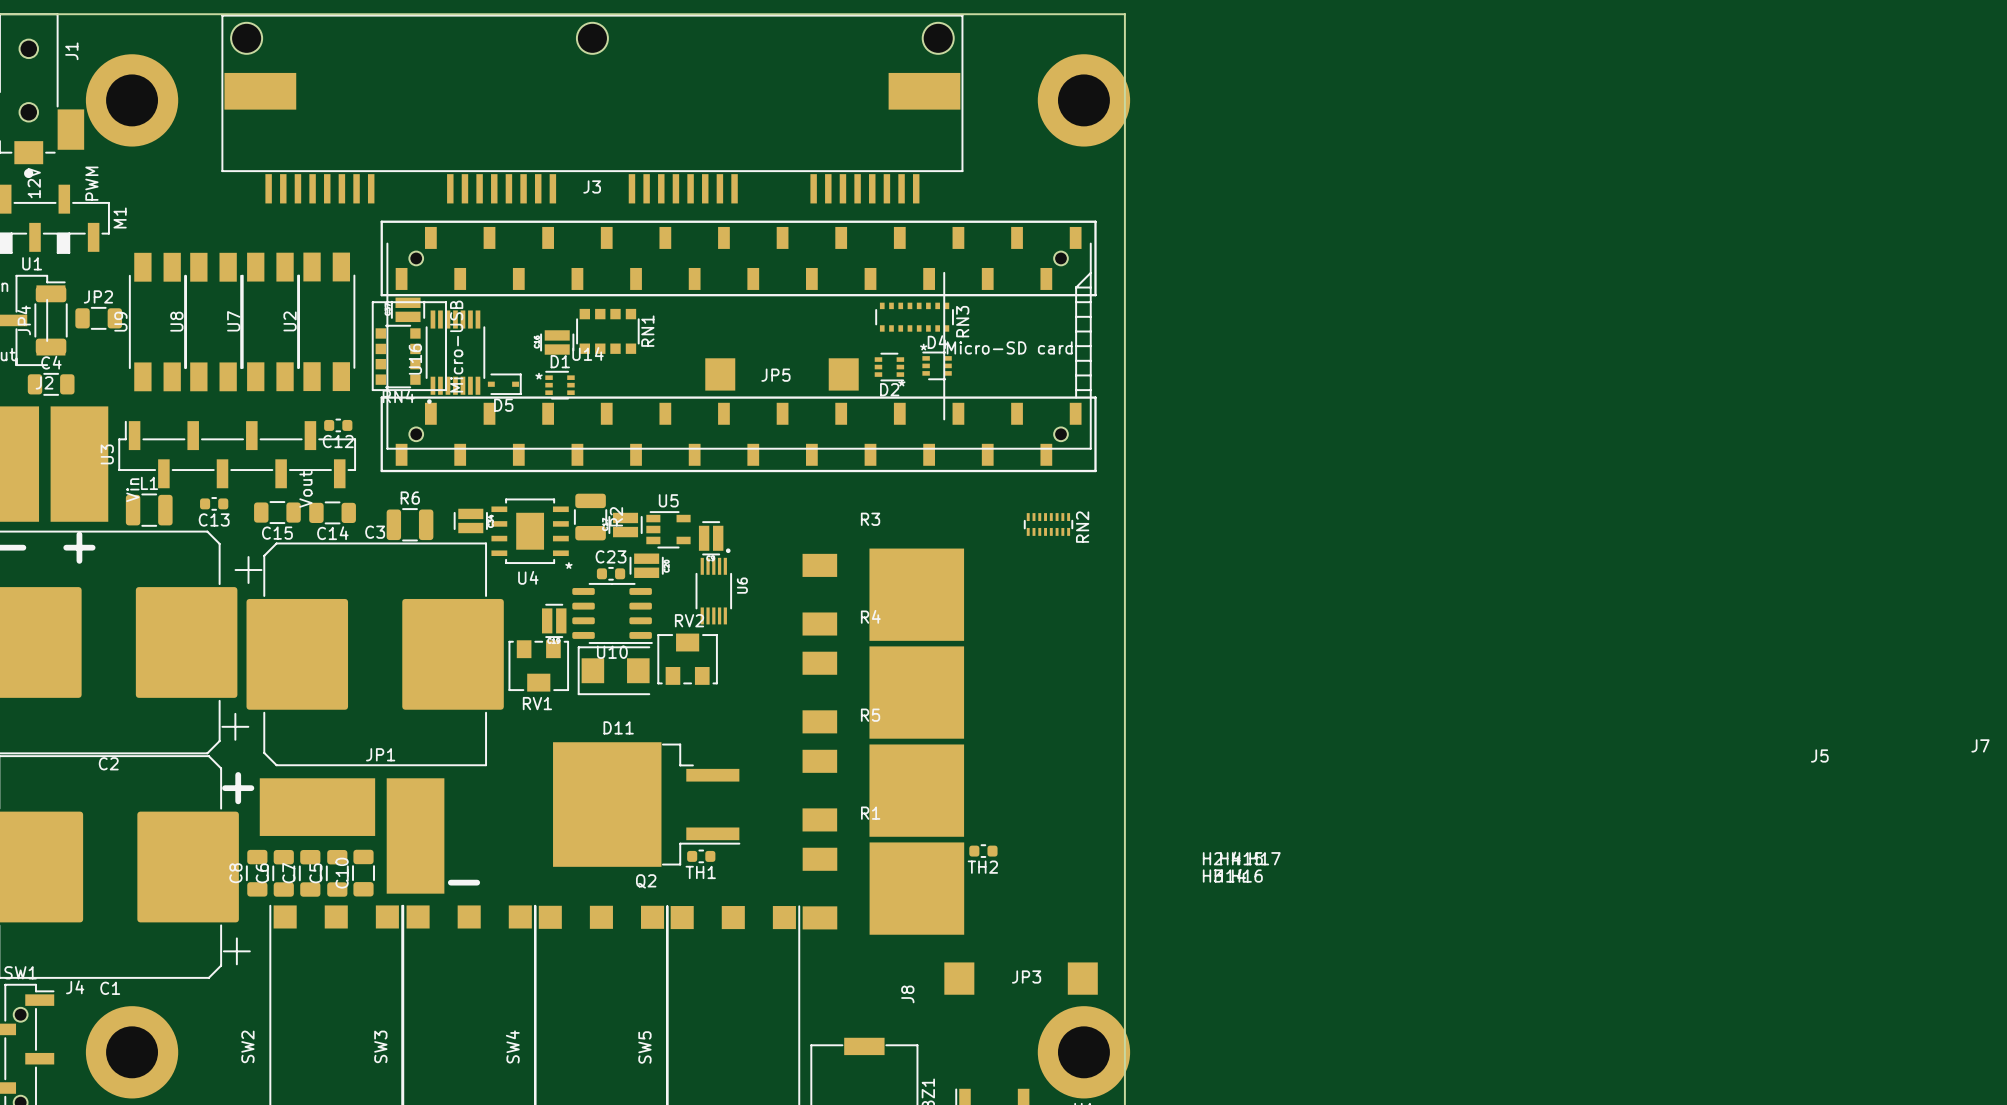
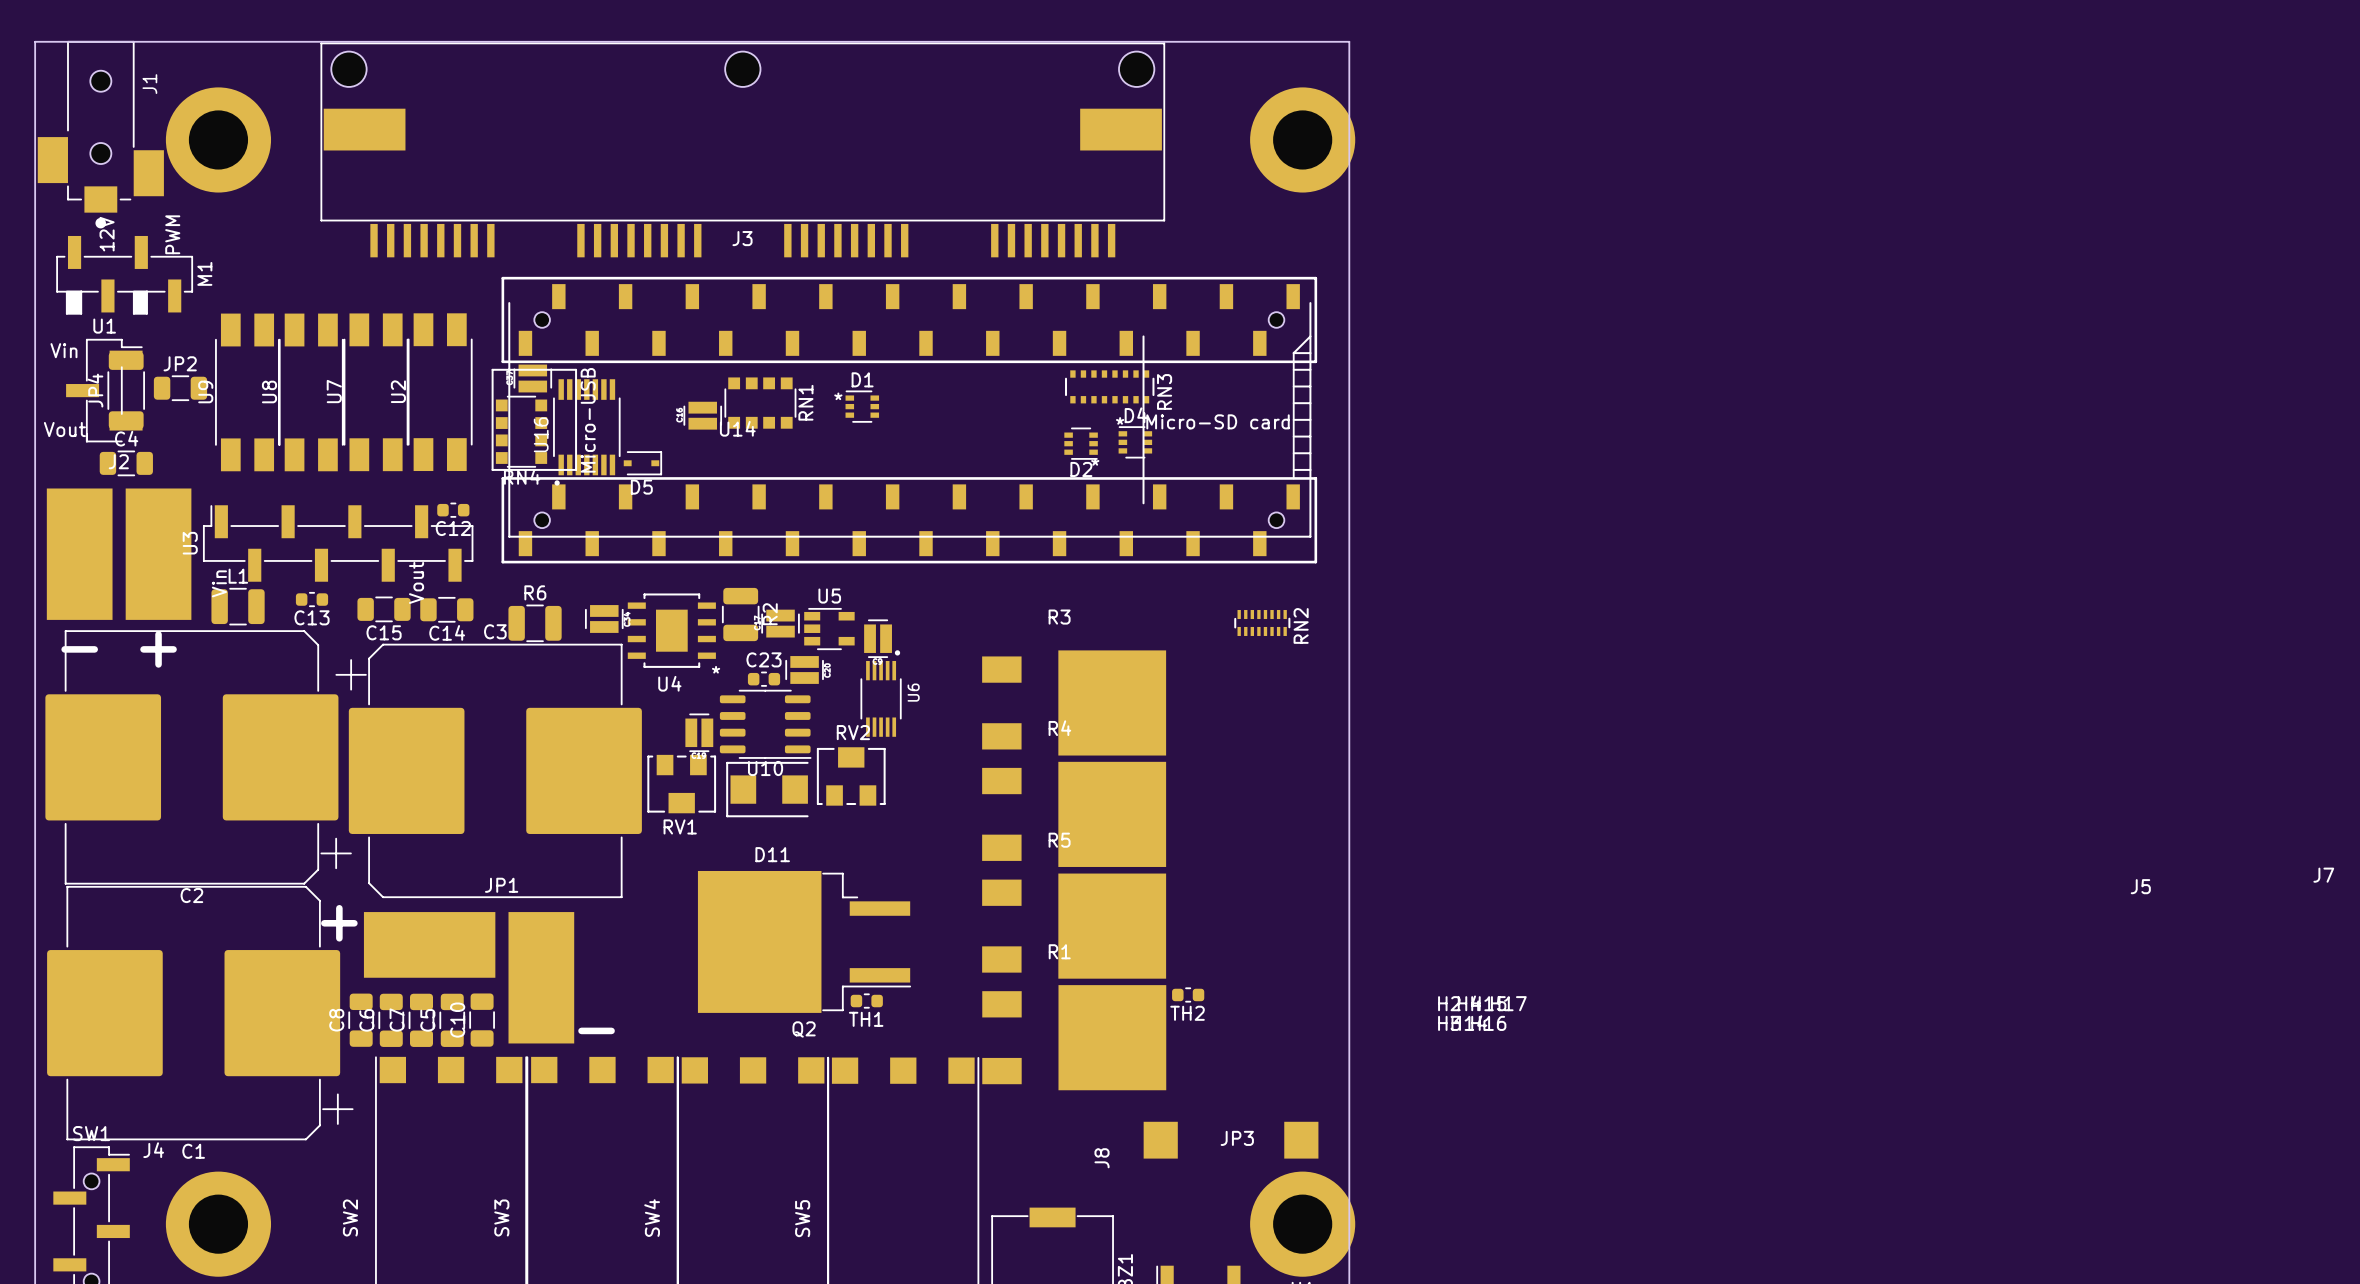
JP5: (782, 374) -> none
D1 position: (560, 385) -> (862, 406)

